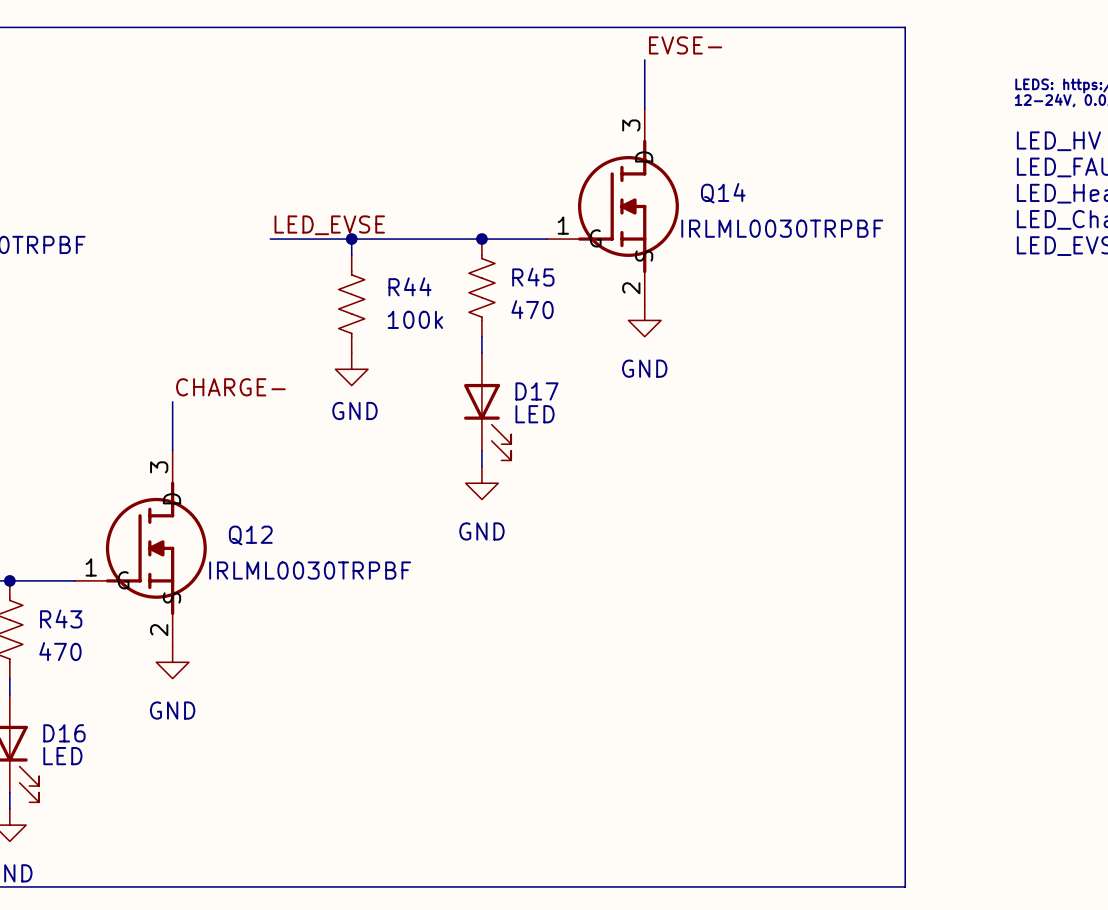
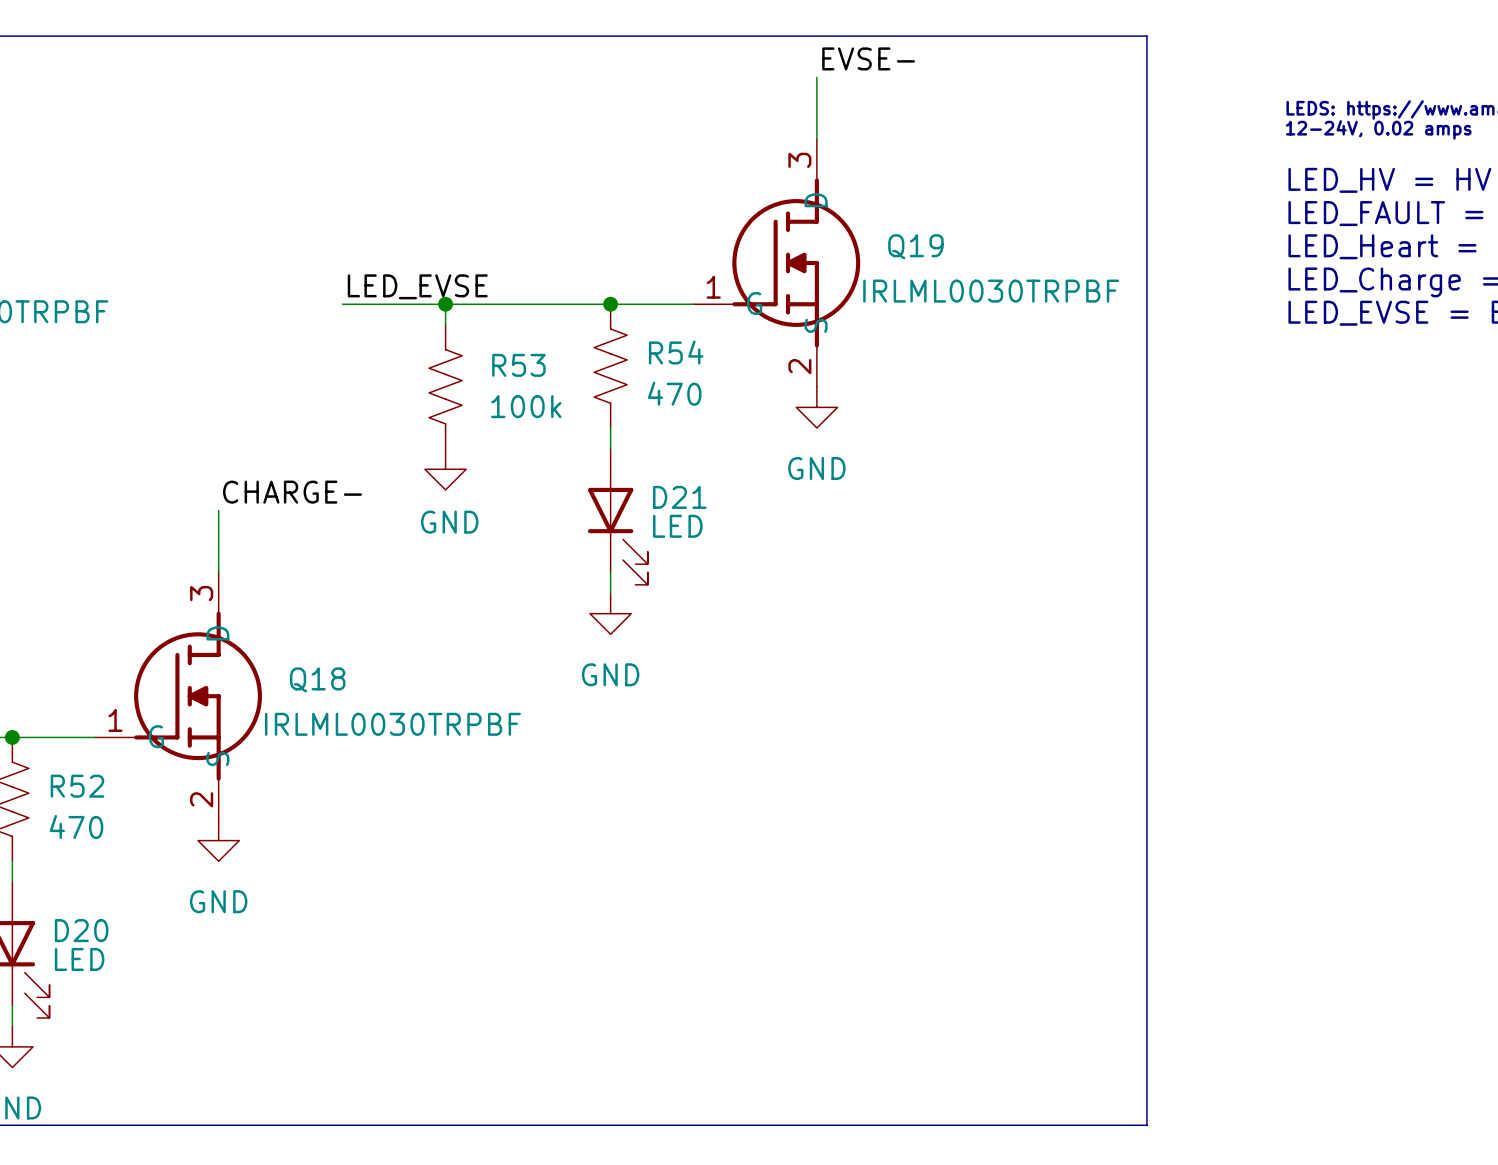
Q14 name: Q14 (723, 193) -> Q19 (915, 246)
R45 name: R45 (533, 277) -> R54 (676, 352)
R44 name: R44 (409, 286) -> R53 (518, 365)
D17 name: D17 (536, 391) -> D21 (679, 497)
Q12 name: Q12 (250, 535) -> Q18 (317, 679)
R43 name: R43 (61, 618) -> R52 (77, 786)
D16 name: D16 (64, 733) -> D20 (81, 930)

